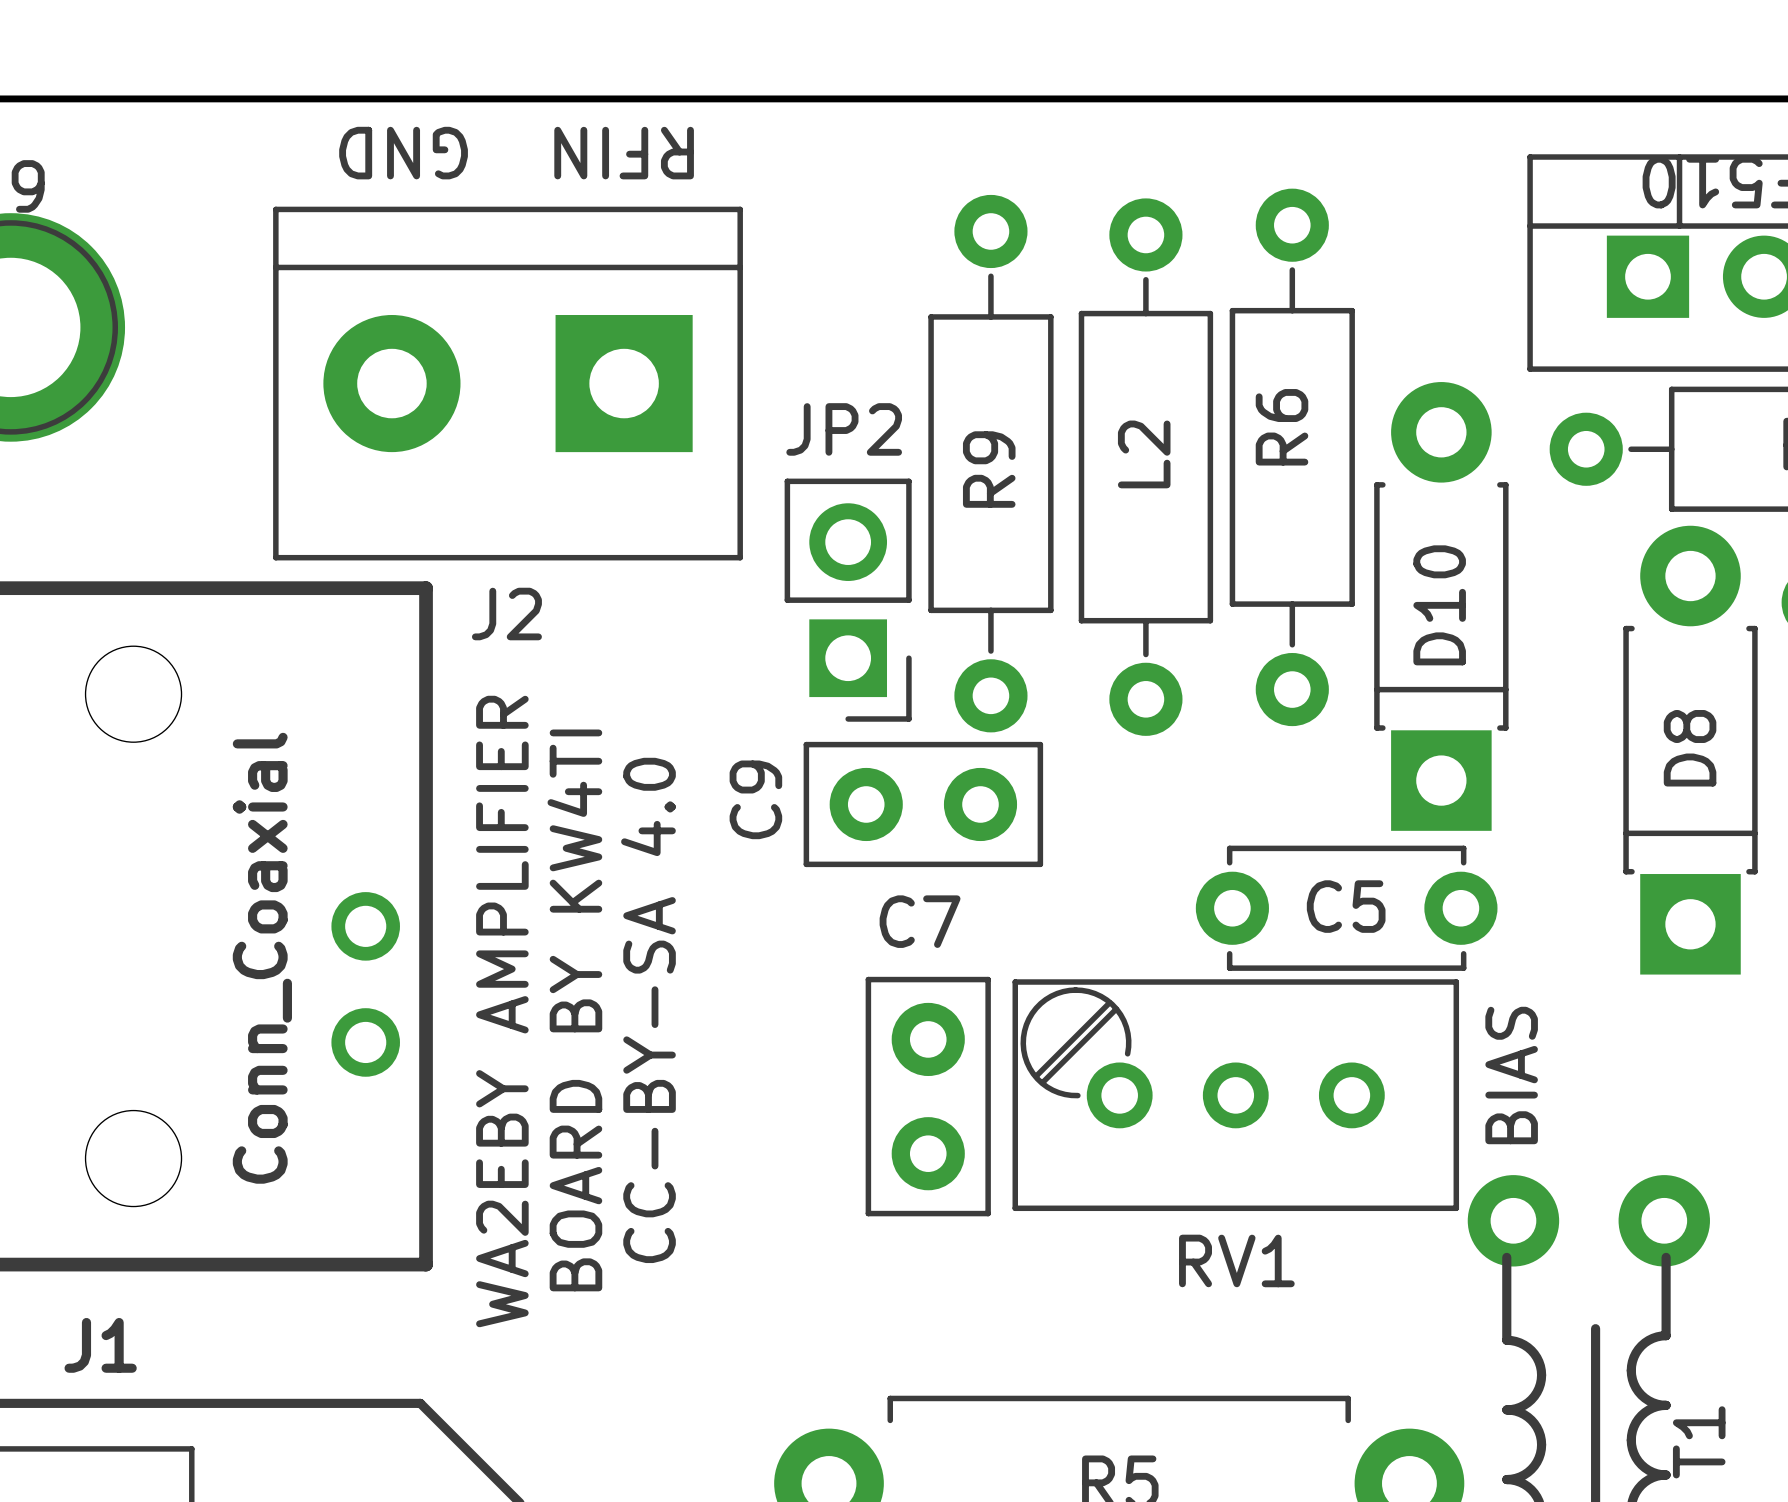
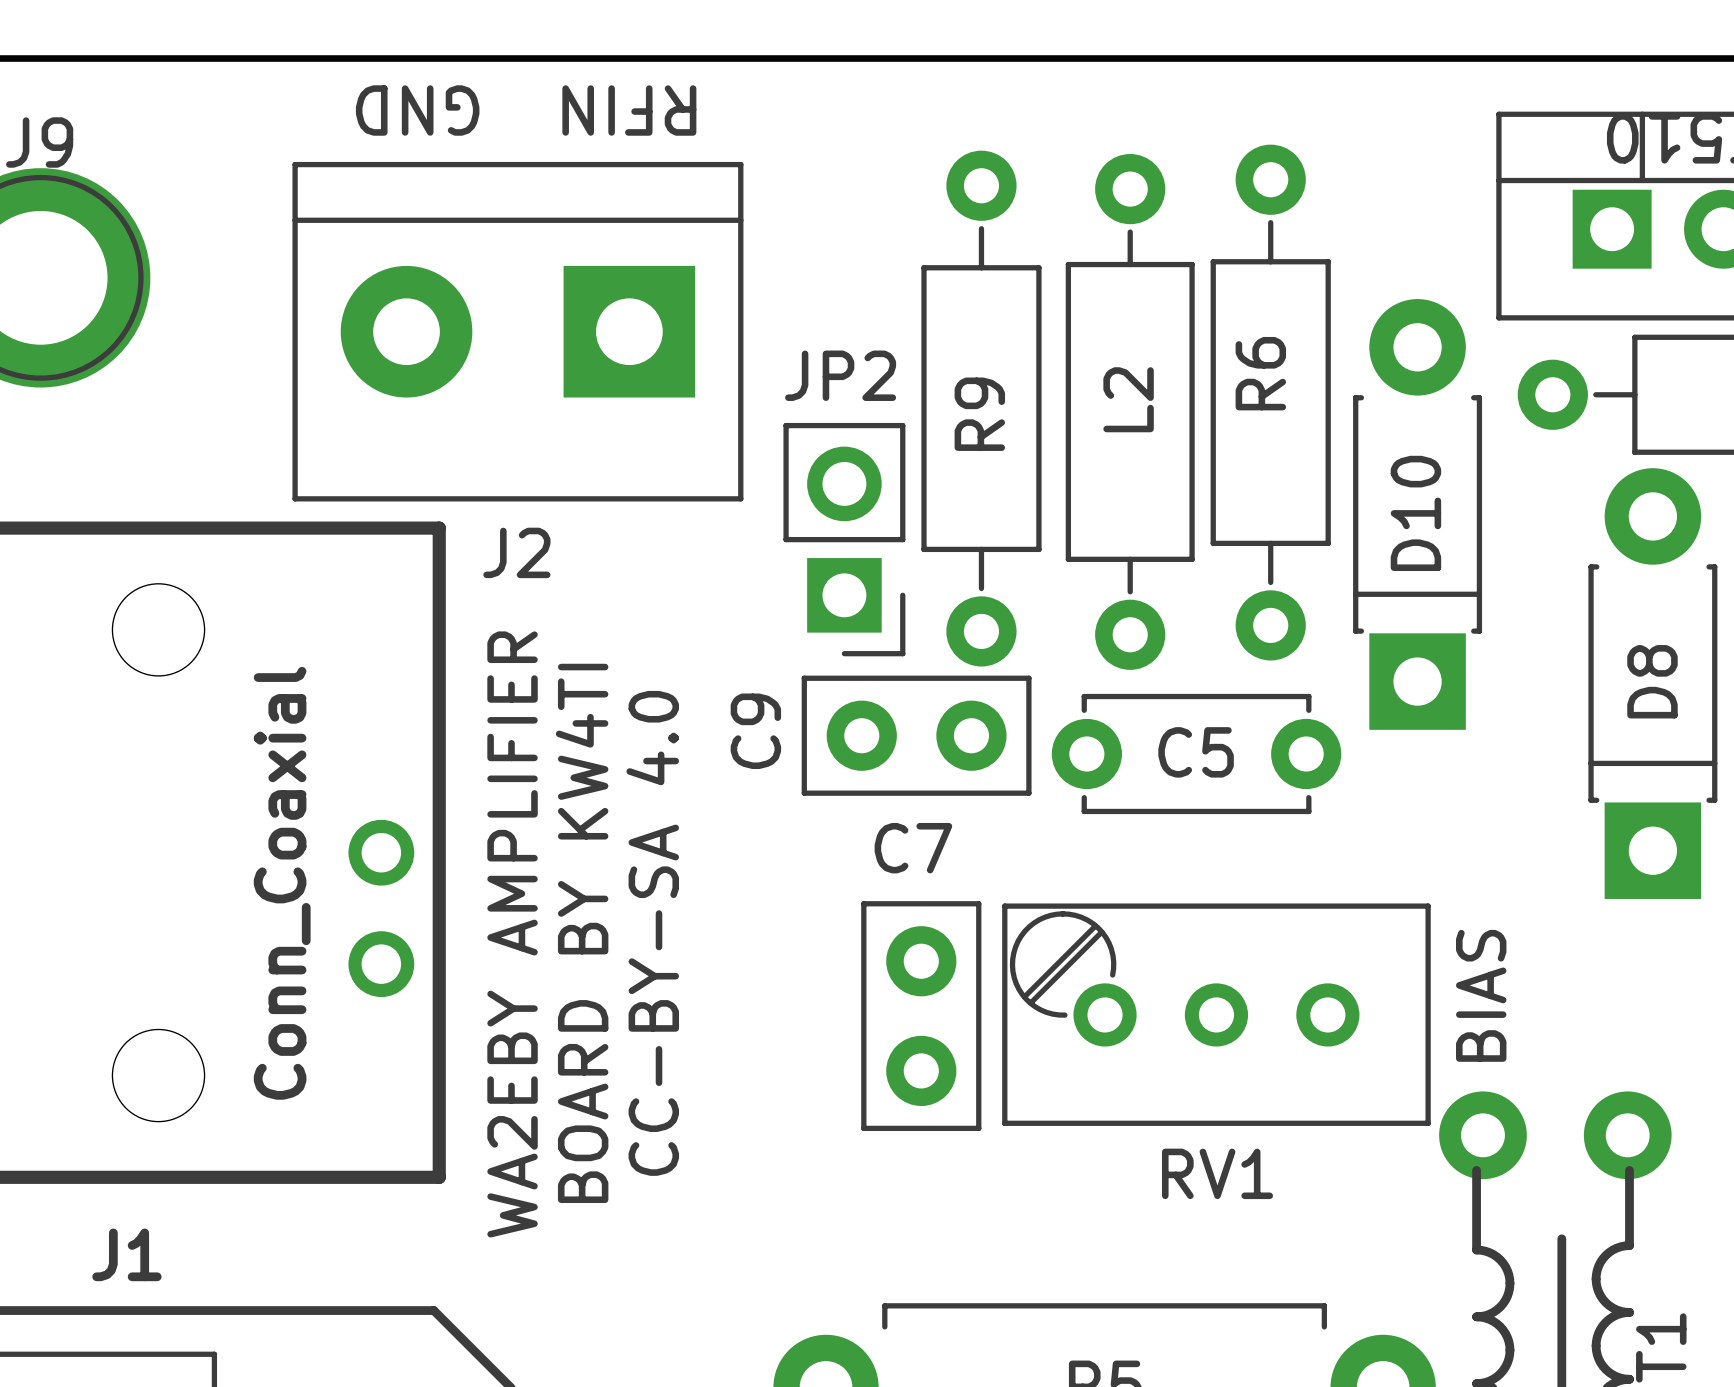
D10 position: (1441, 606) -> (1417, 514)
C5 position: (1346, 908) -> (1196, 754)

